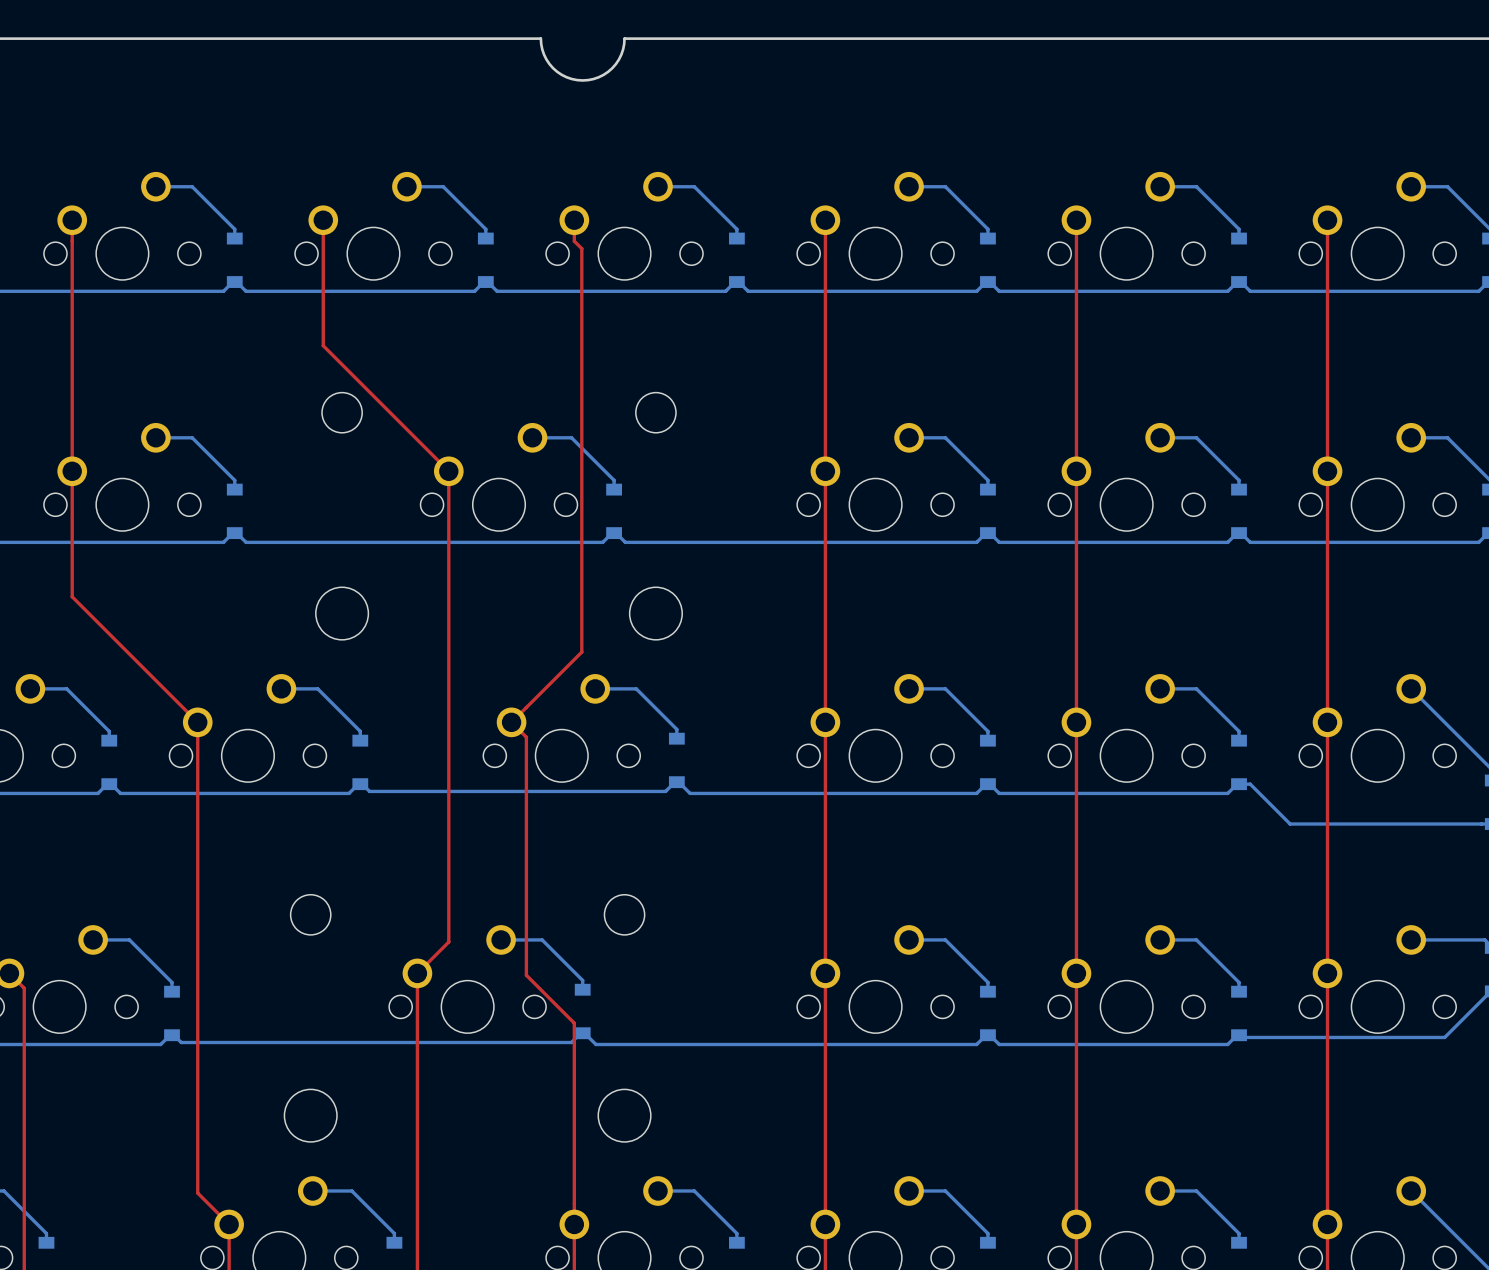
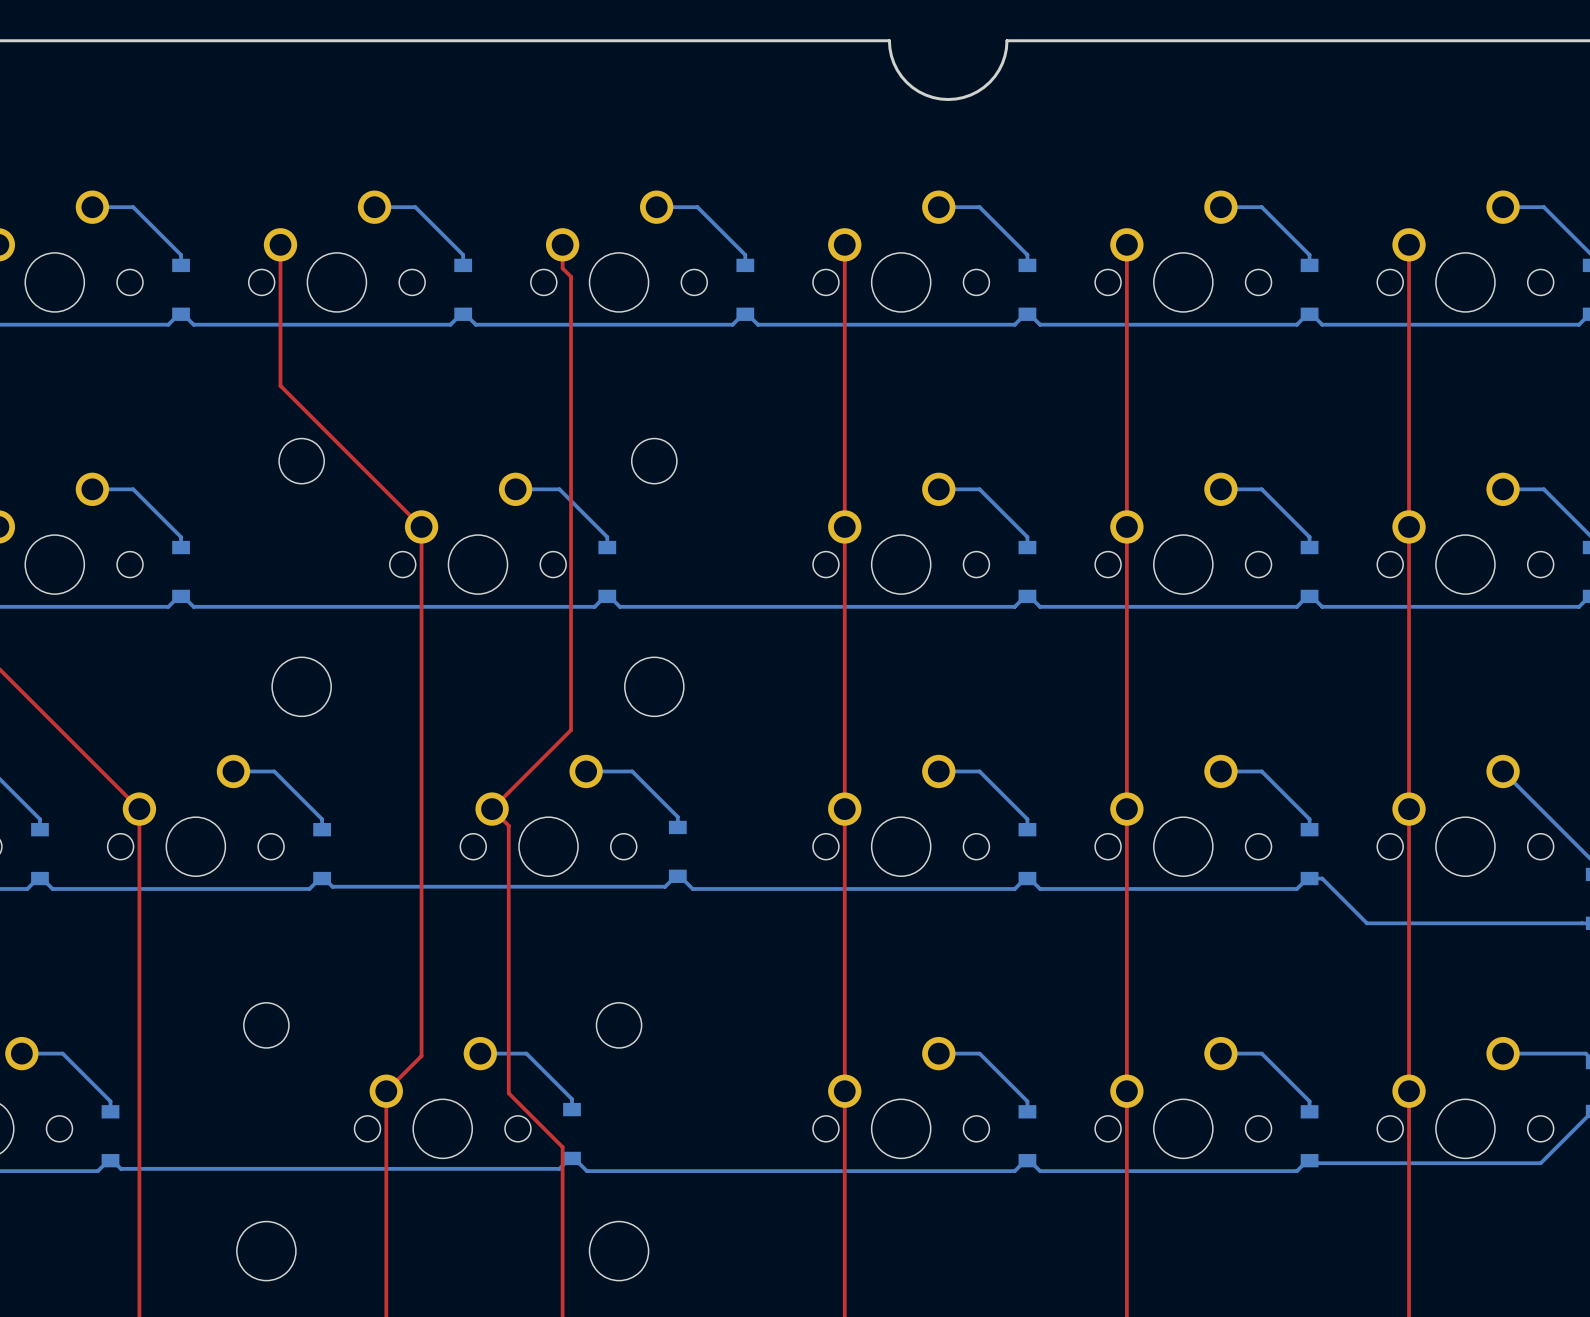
board edge: (540, 38) (544, 54) (553, 68) (566, 77) (582, 80) (598, 77) (612, 68) (621, 54) (624, 38) -> (525, 40) (619, 40)
board edge: (865, 38) (969, 38) -> (889, 40) (893, 63) (906, 82) (925, 95) (948, 99) (970, 95) (989, 82) (1002, 63) (1006, 40)

